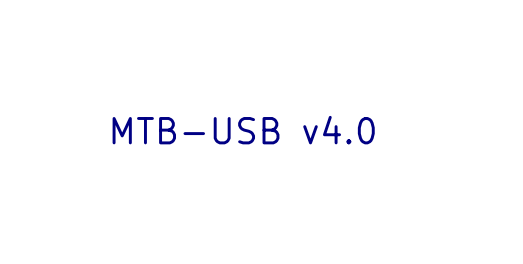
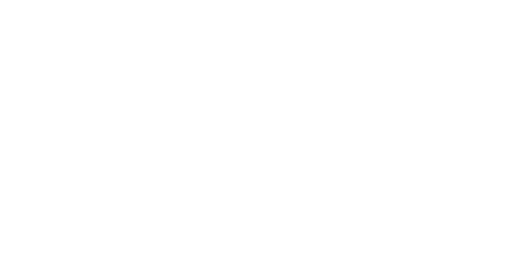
text: MTB-USB v4.0 (243, 130) -> none

